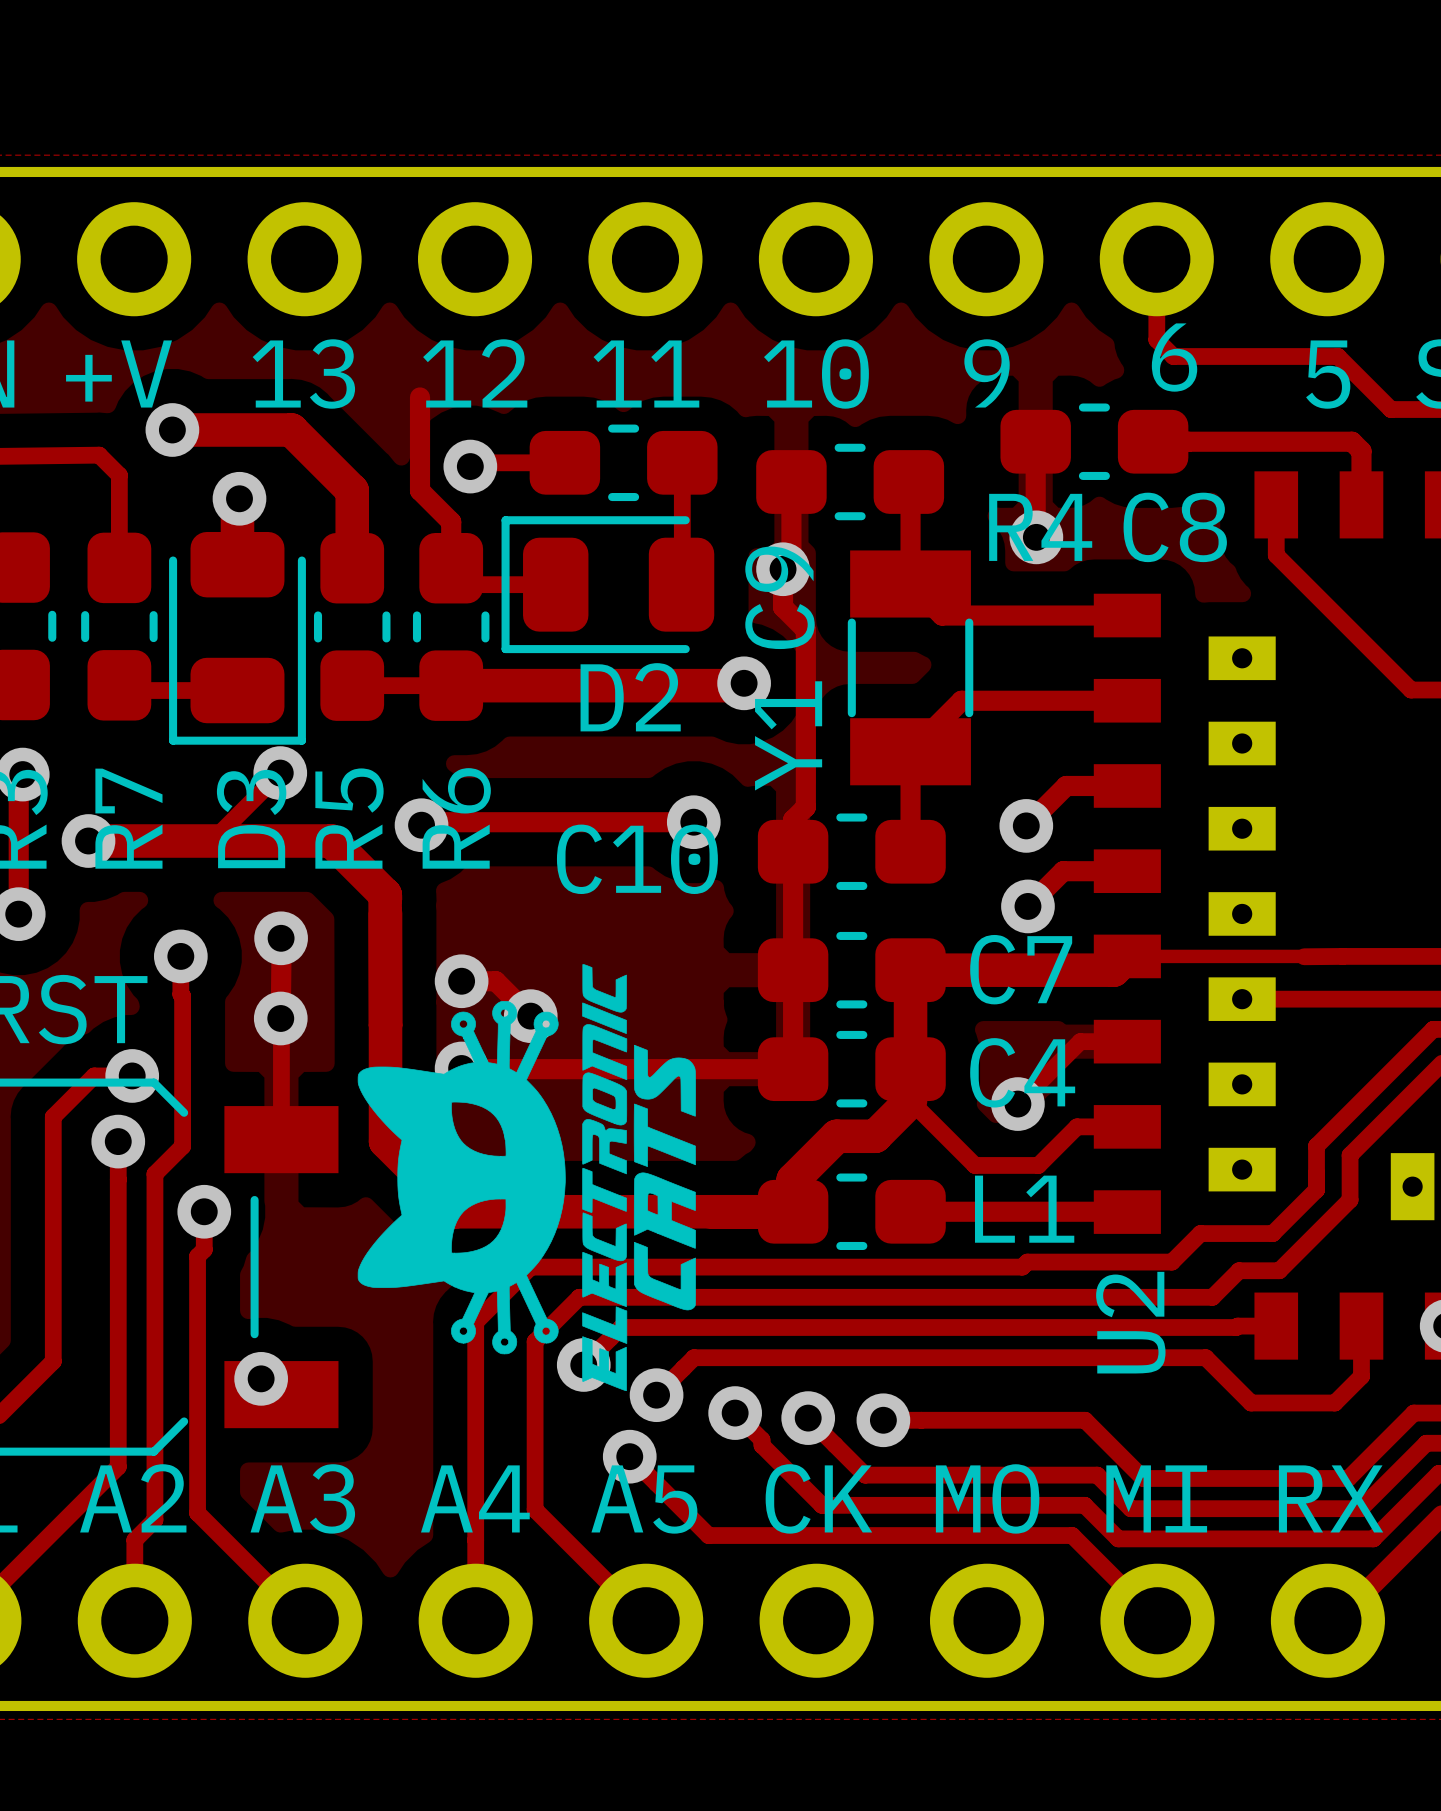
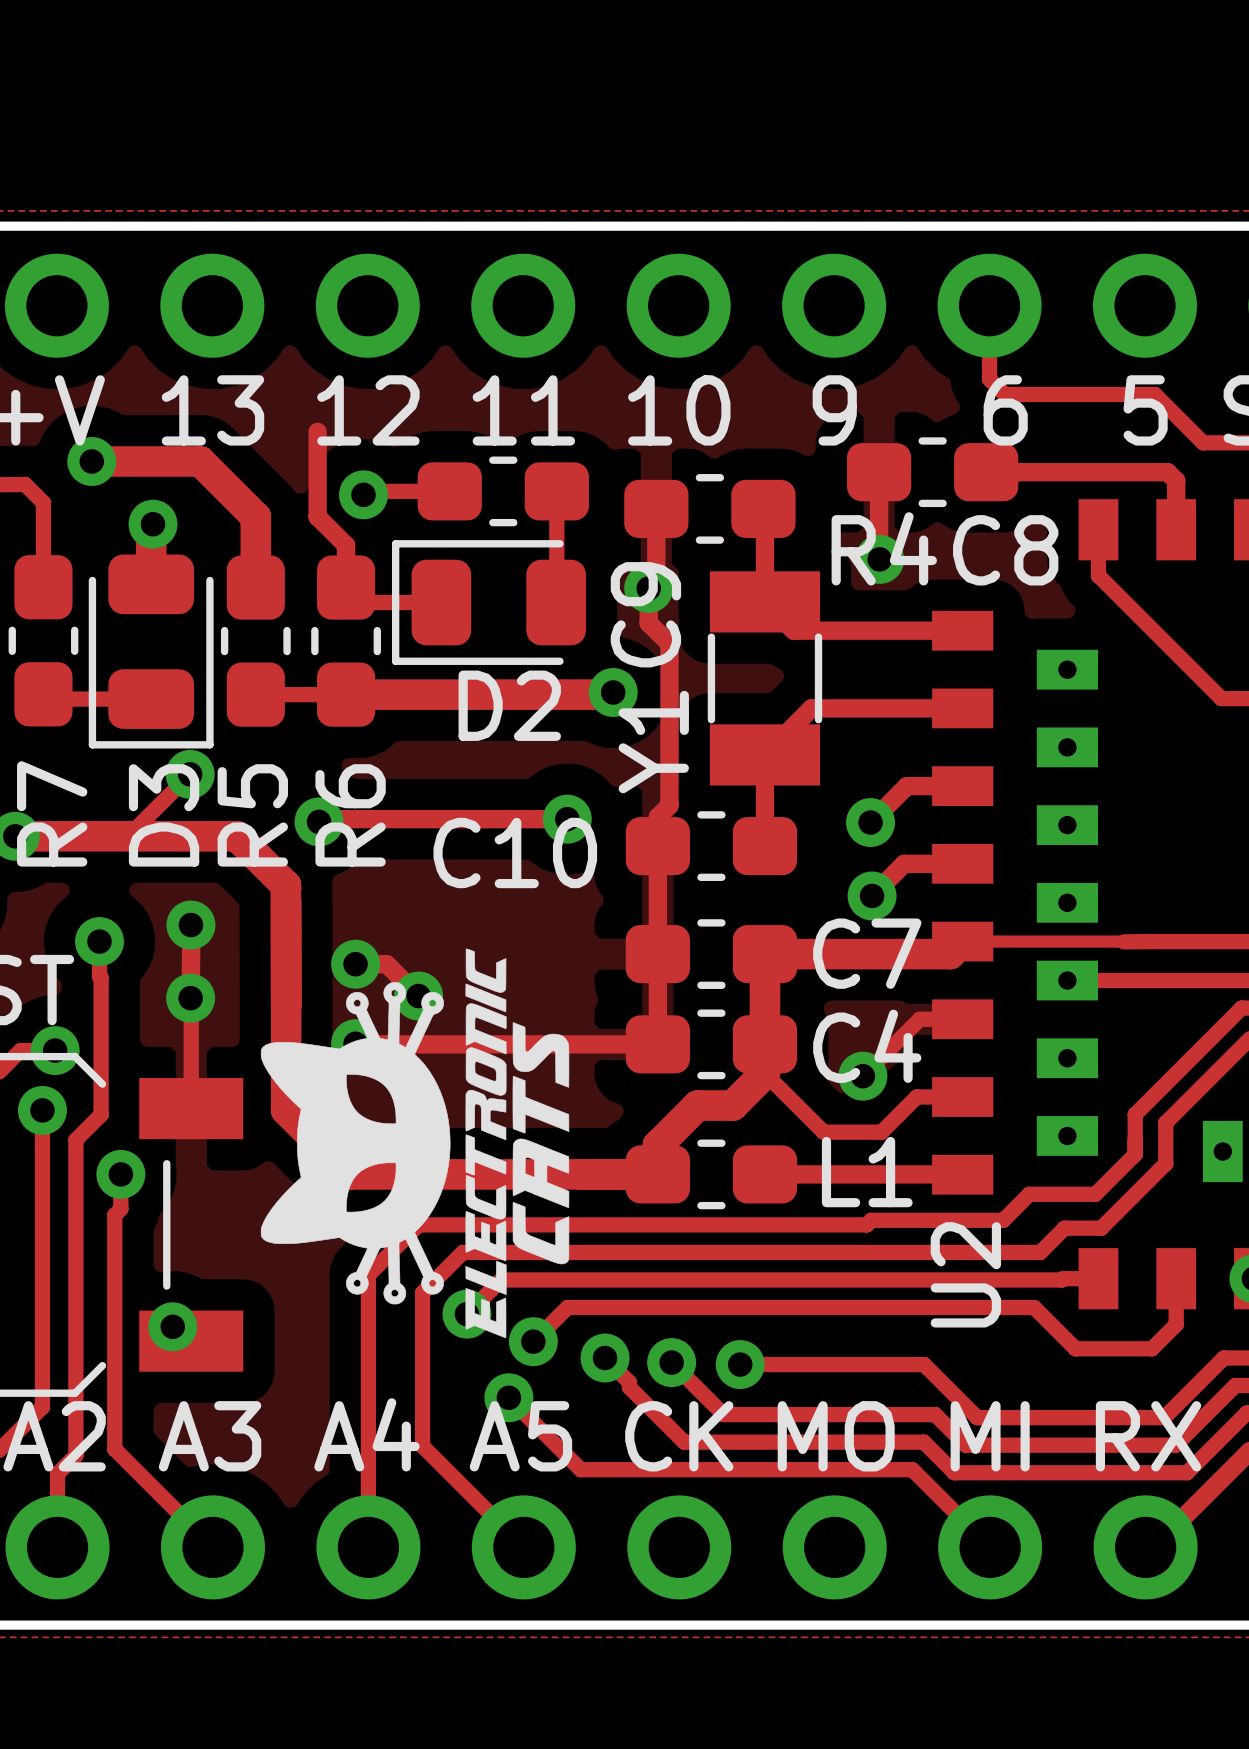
text position: 6 (1174, 357) -> 6 (1005, 410)

